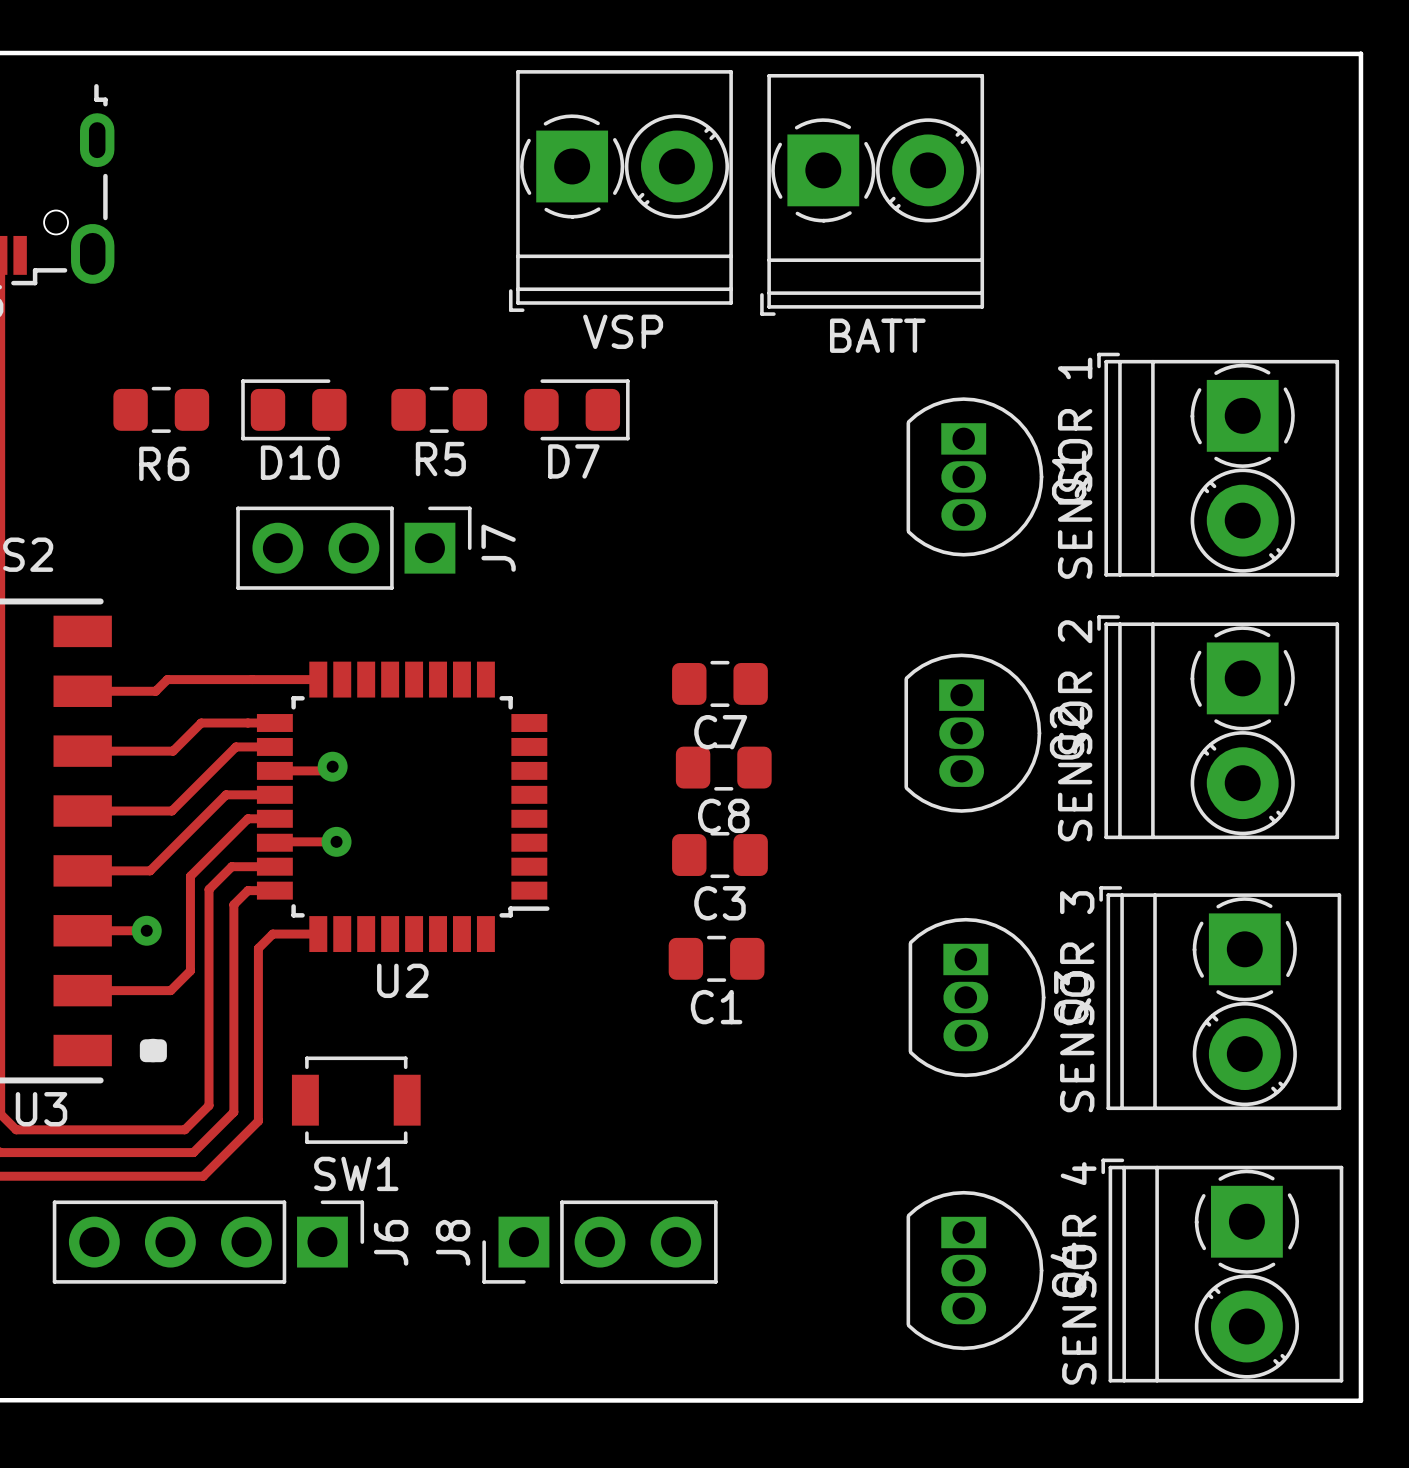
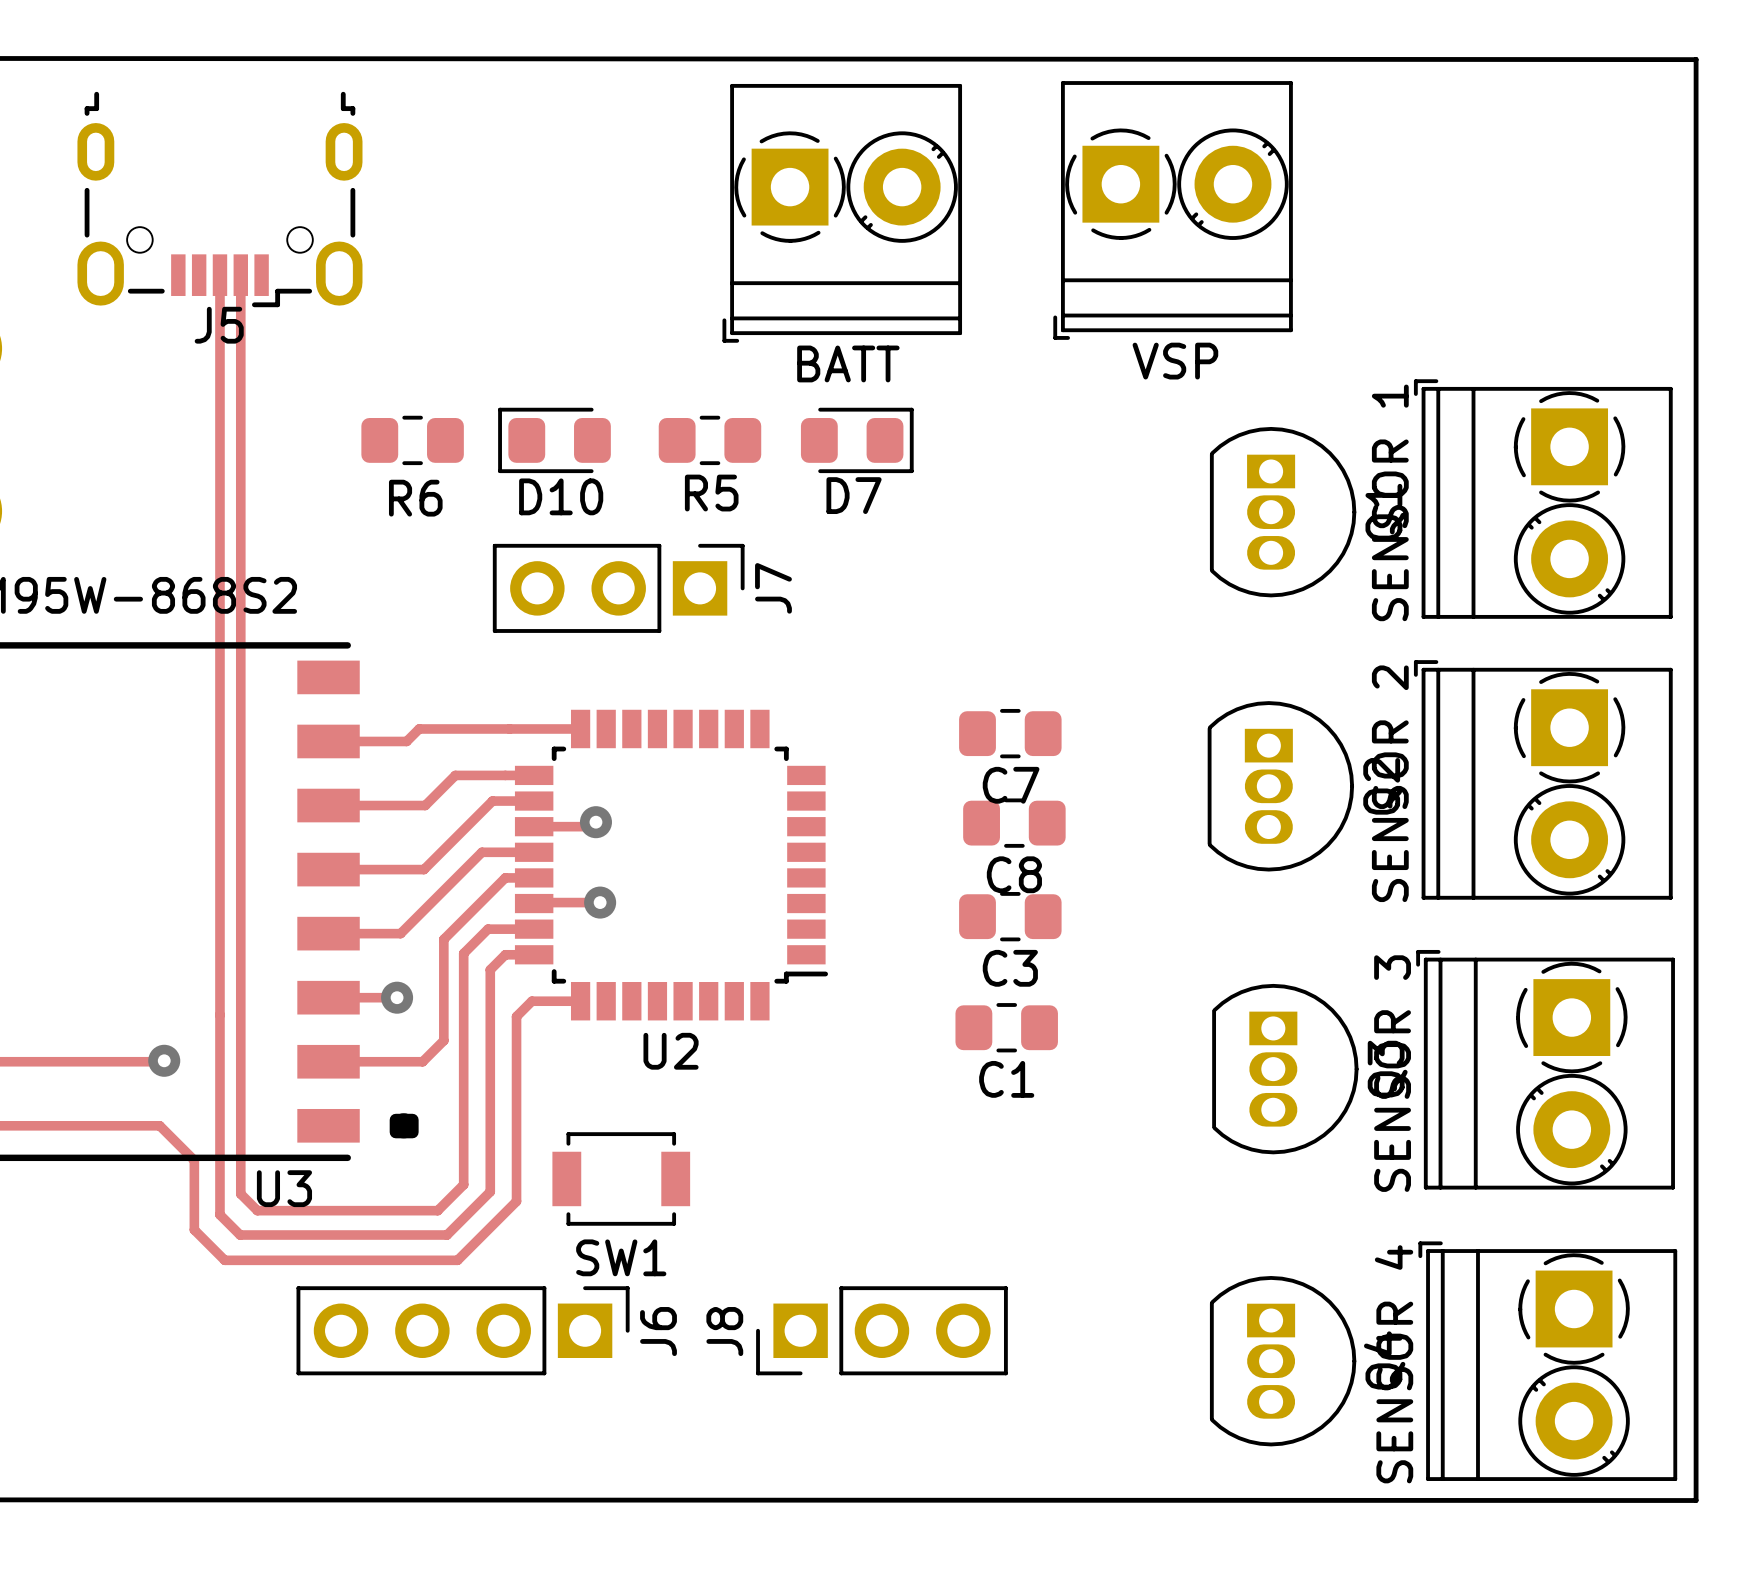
part: VSP (620, 191) -> none
part: none -> BATT (842, 213)
part value: BATT (877, 335) -> VSP (1175, 361)

